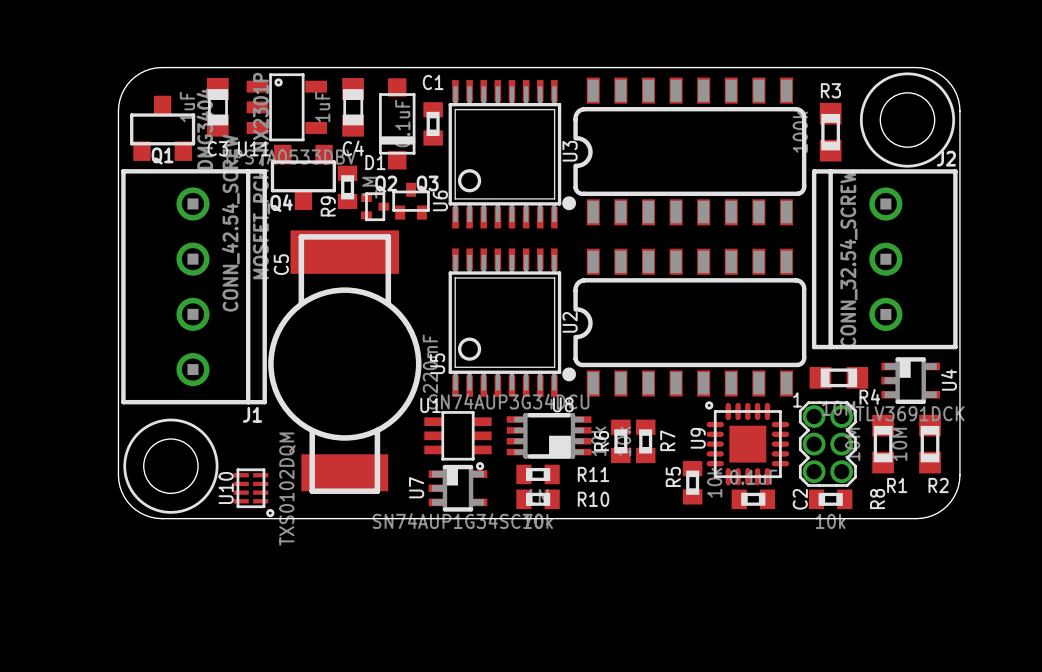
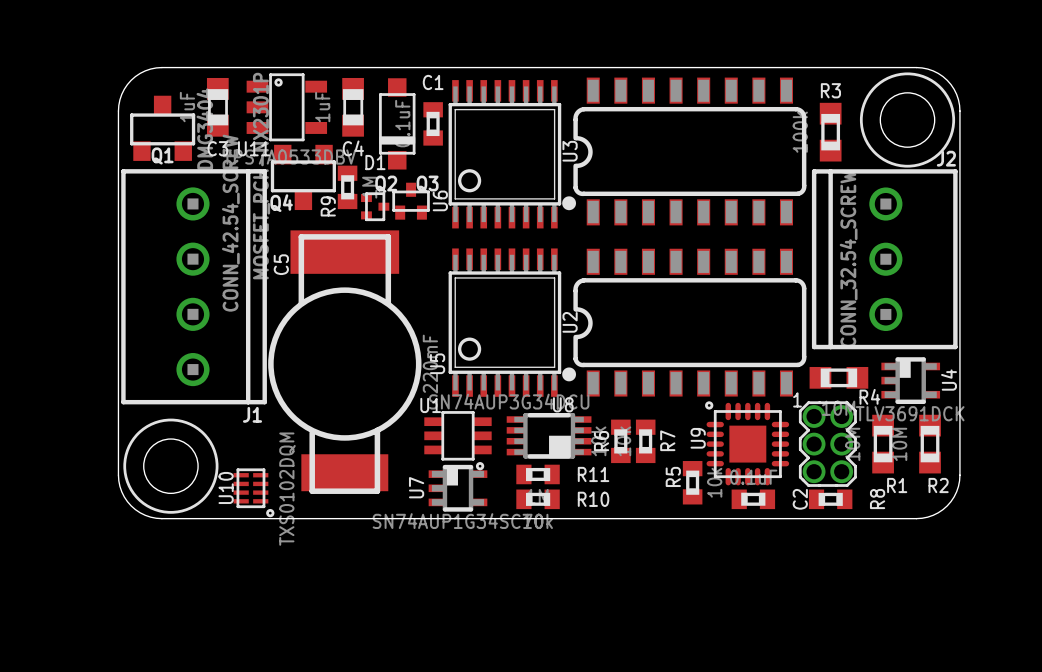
R8 value: 10k (830, 521) -> none

